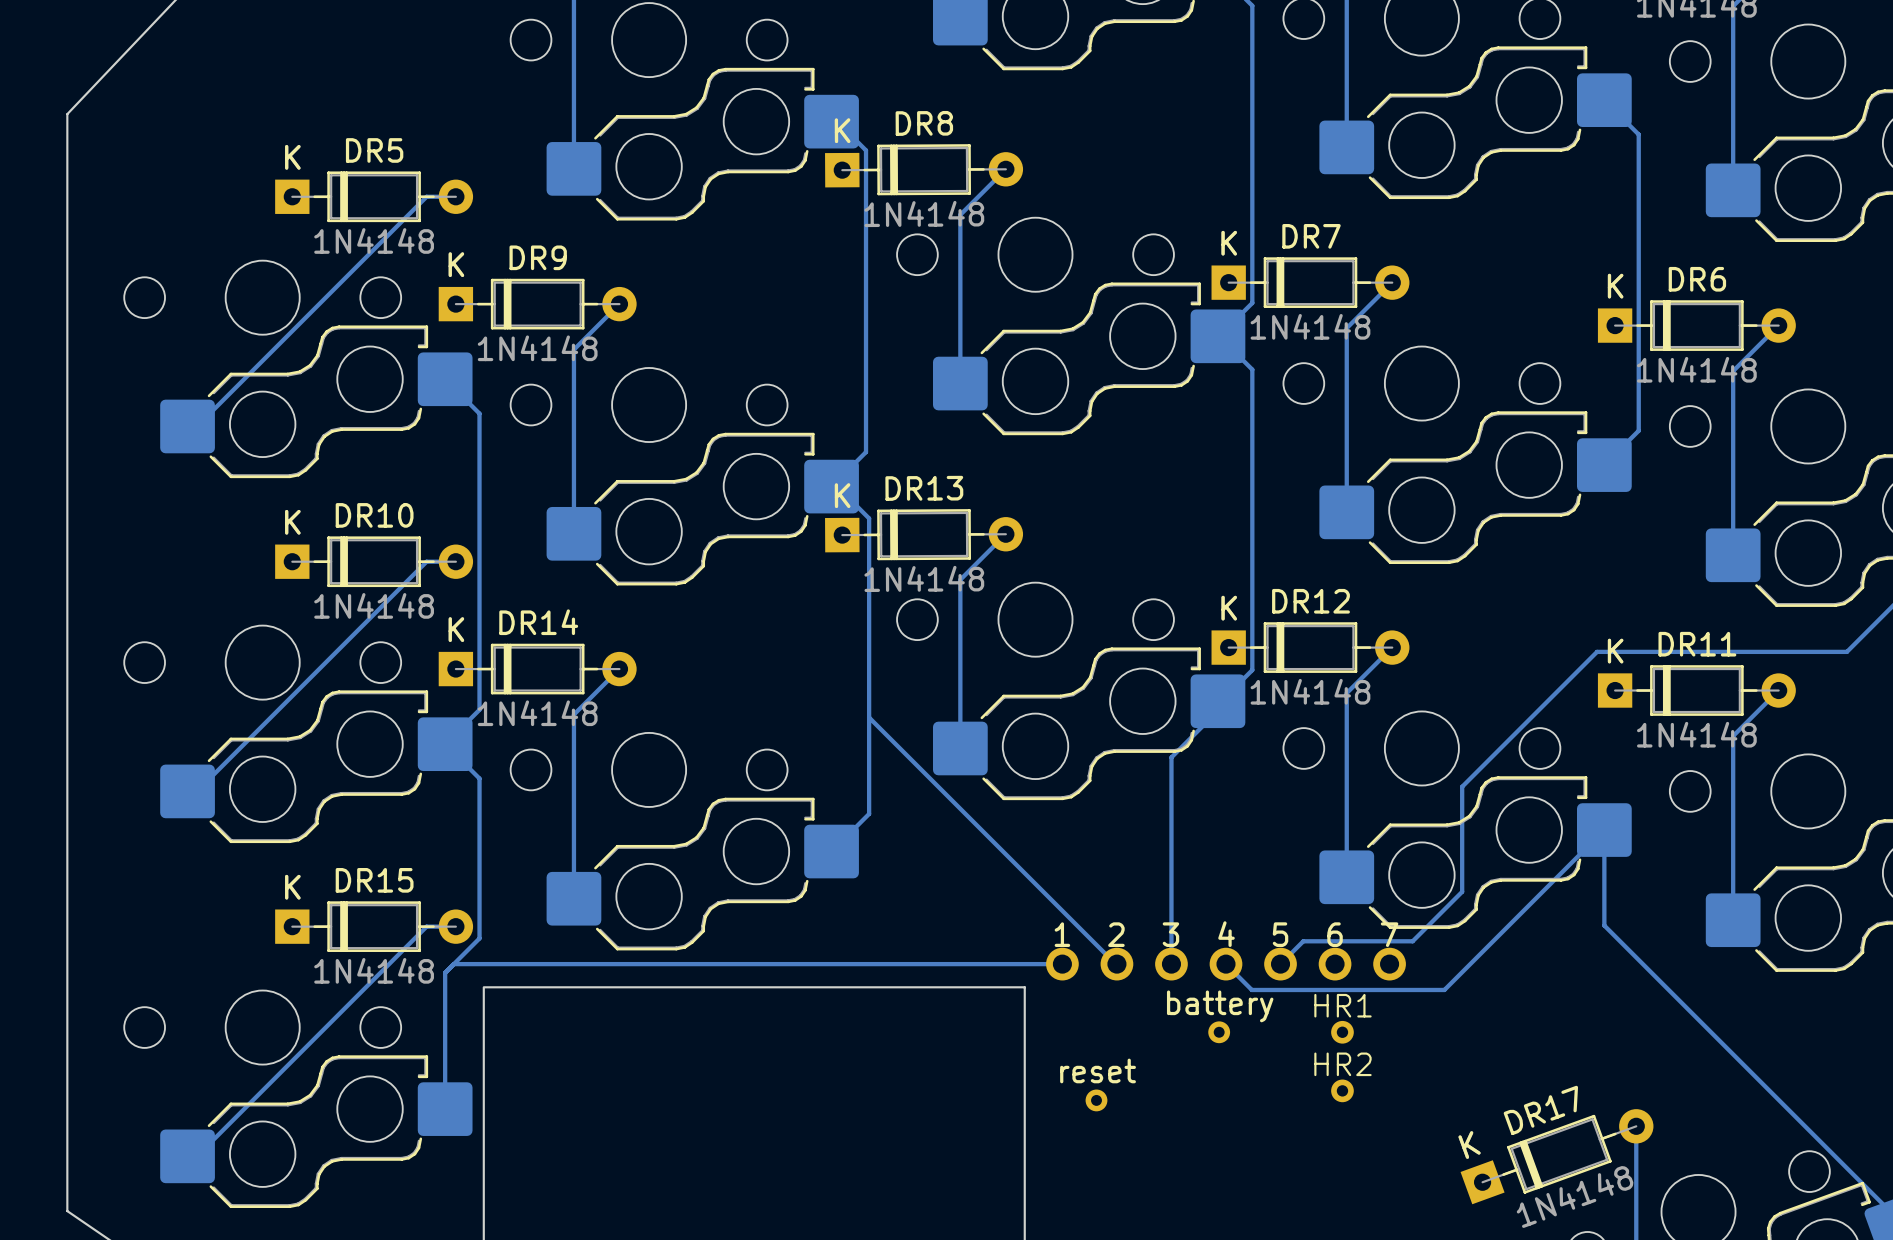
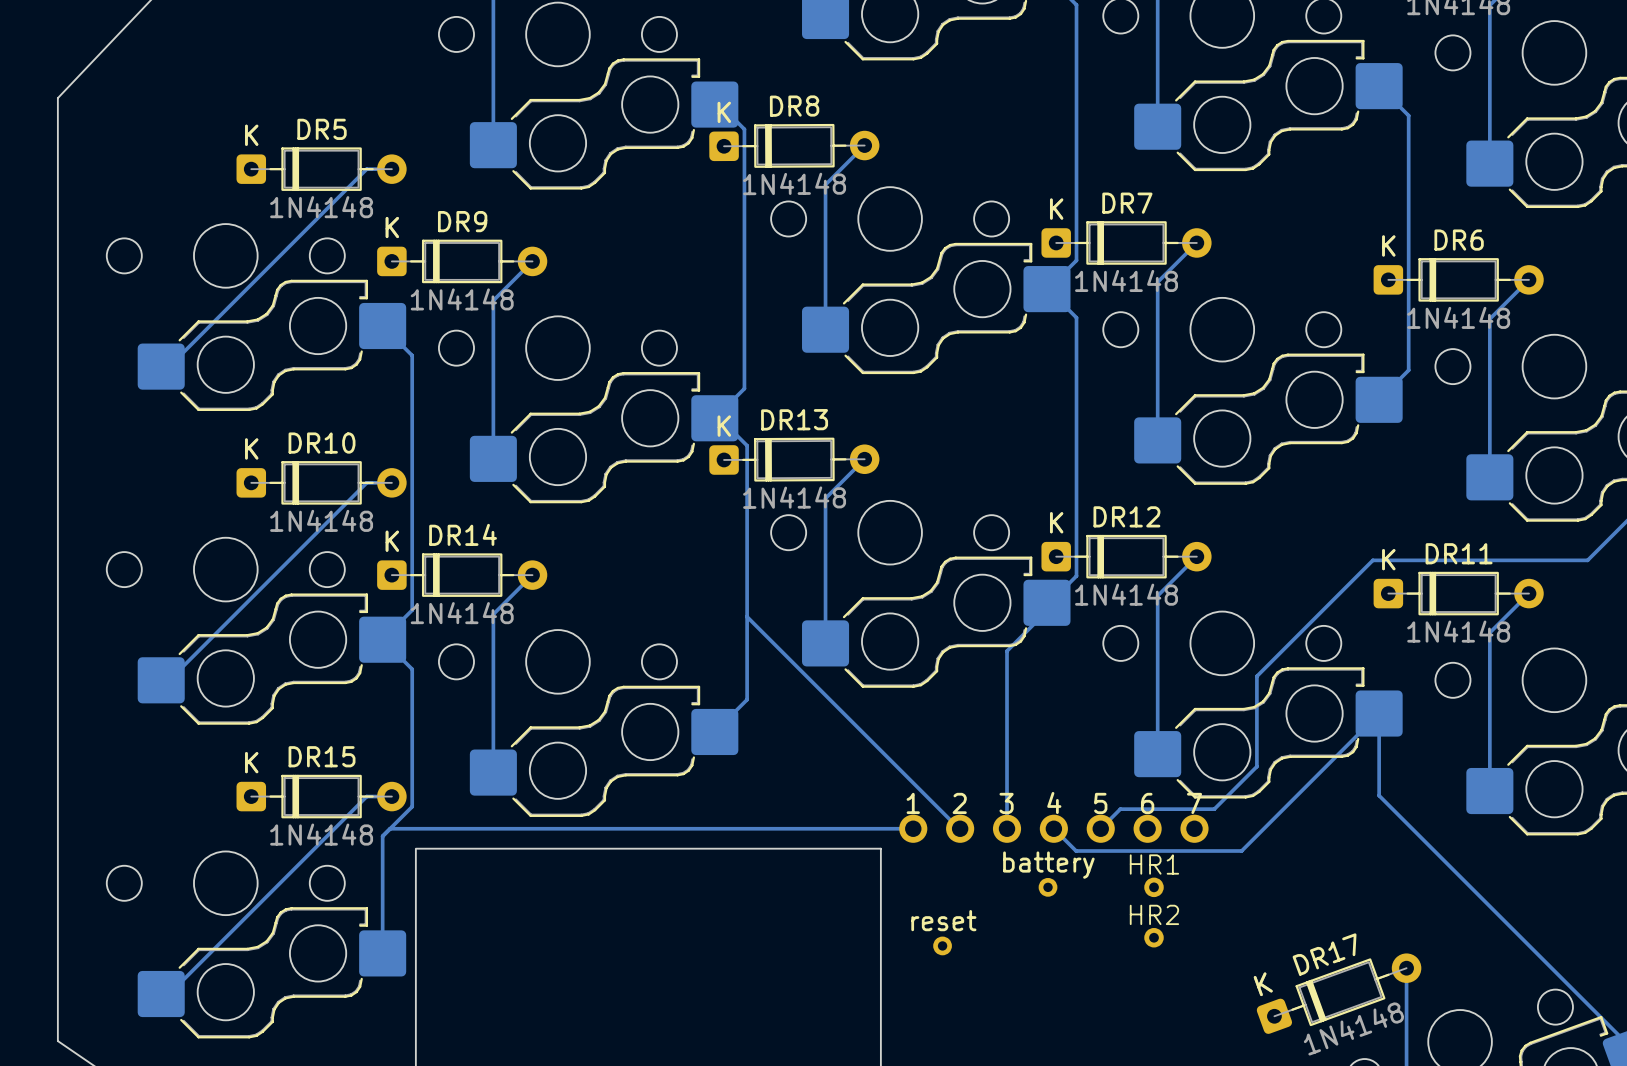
DR8 footprint: [825, 144, 1024, 196] -> [709, 123, 880, 168]
DR5 footprint: [275, 171, 474, 223] -> [236, 147, 407, 191]
DR7 footprint: [1211, 257, 1410, 308] -> [1041, 221, 1212, 265]
DR9 footprint: [438, 278, 637, 330] -> [377, 239, 548, 284]
DR6 footprint: [1597, 300, 1796, 351] -> [1373, 258, 1544, 302]
DR13 footprint: [825, 509, 1024, 561] -> [709, 437, 880, 482]
DR10 footprint: [275, 536, 474, 588] -> [236, 461, 407, 505]
DR12 footprint: [1211, 622, 1410, 673] -> [1041, 534, 1212, 579]
DR14 footprint: [438, 643, 637, 695] -> [377, 553, 548, 597]
DR11 footprint: [1597, 665, 1796, 716] -> [1373, 571, 1544, 616]
DR15 footprint: [275, 901, 474, 952] -> [236, 774, 407, 819]
DR17 footprint: [1460, 1109, 1654, 1205] -> [1256, 953, 1422, 1034]

